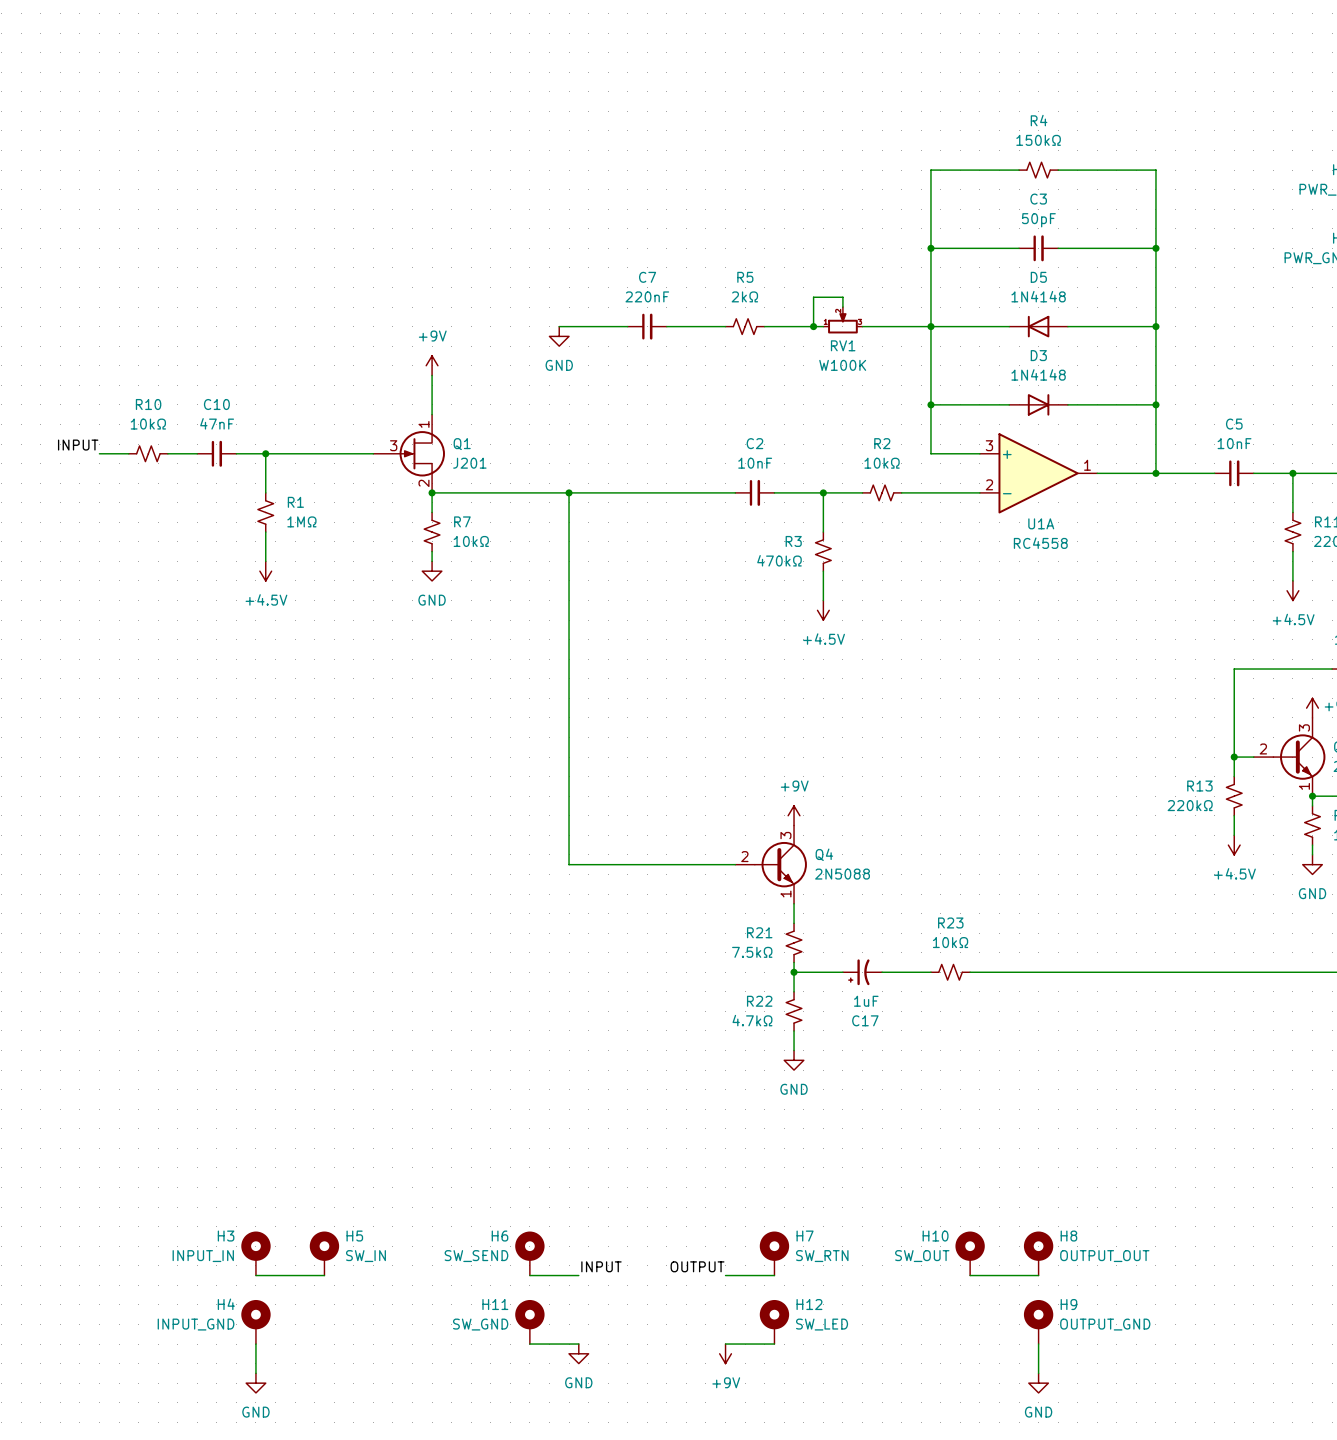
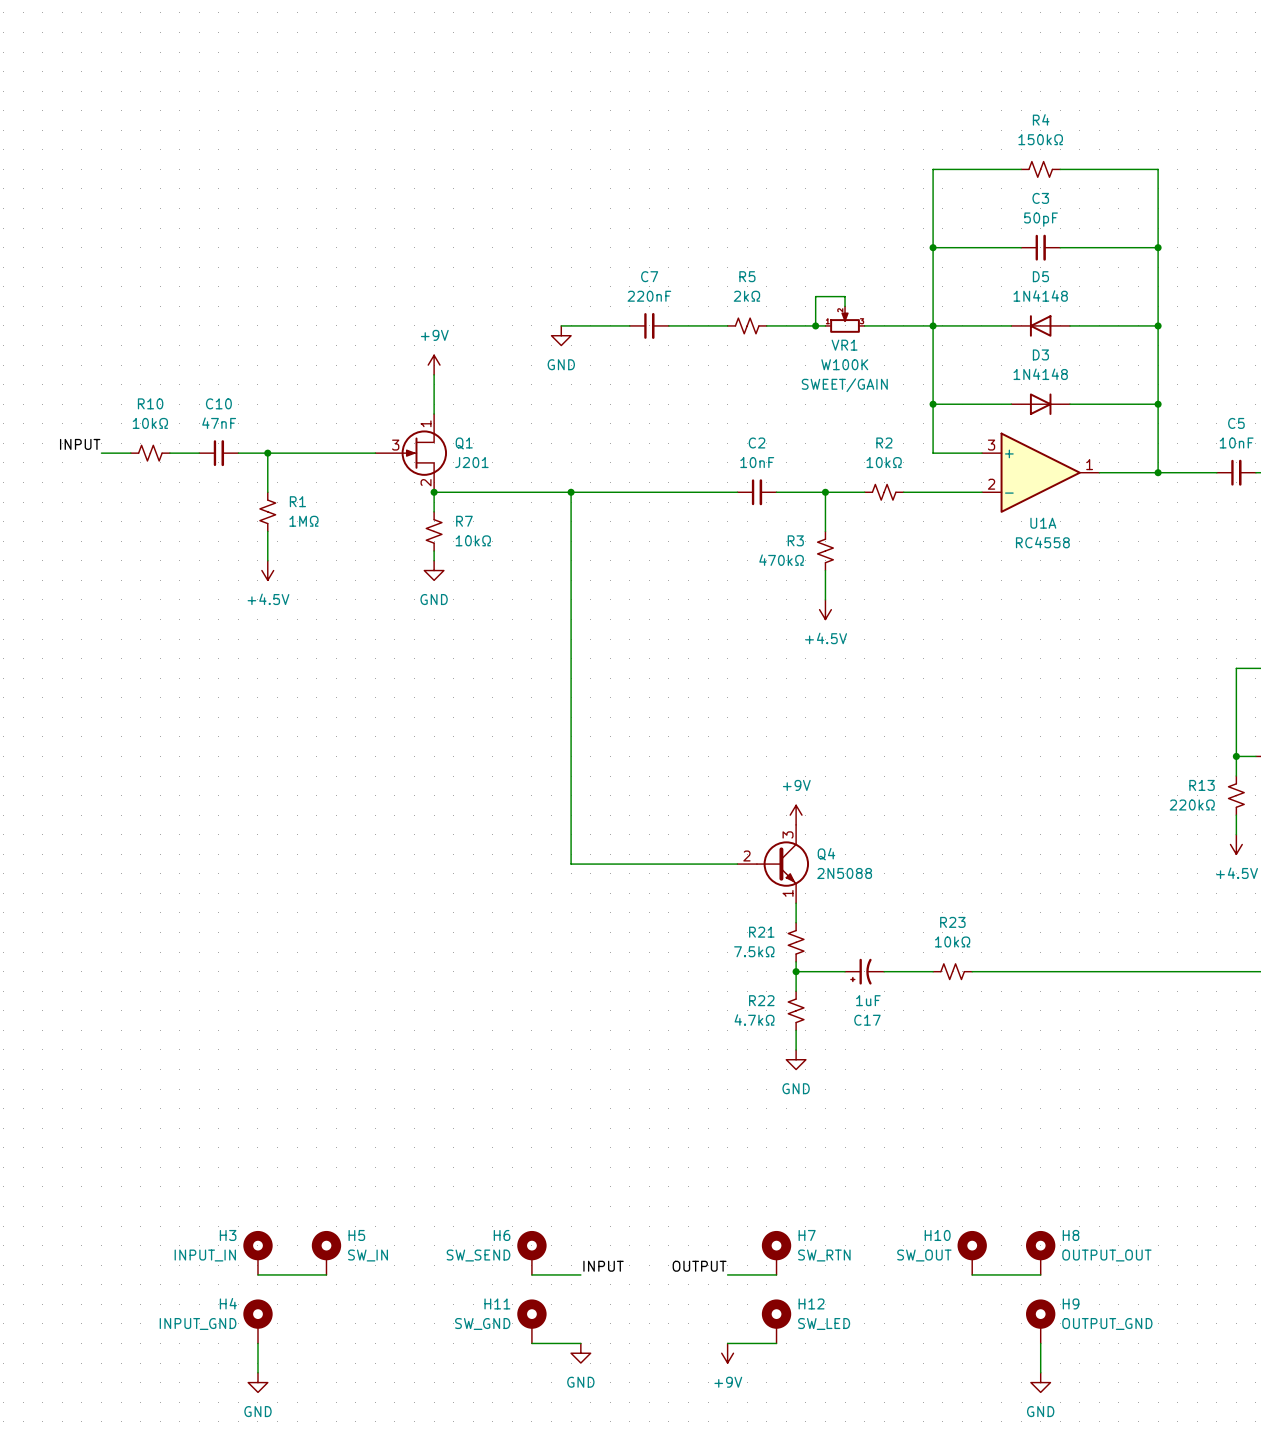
RV1 name: RV1 (843, 345) -> VR1 (844, 345)
RV1 text: none -> SWEET/GAIN (844, 385)

